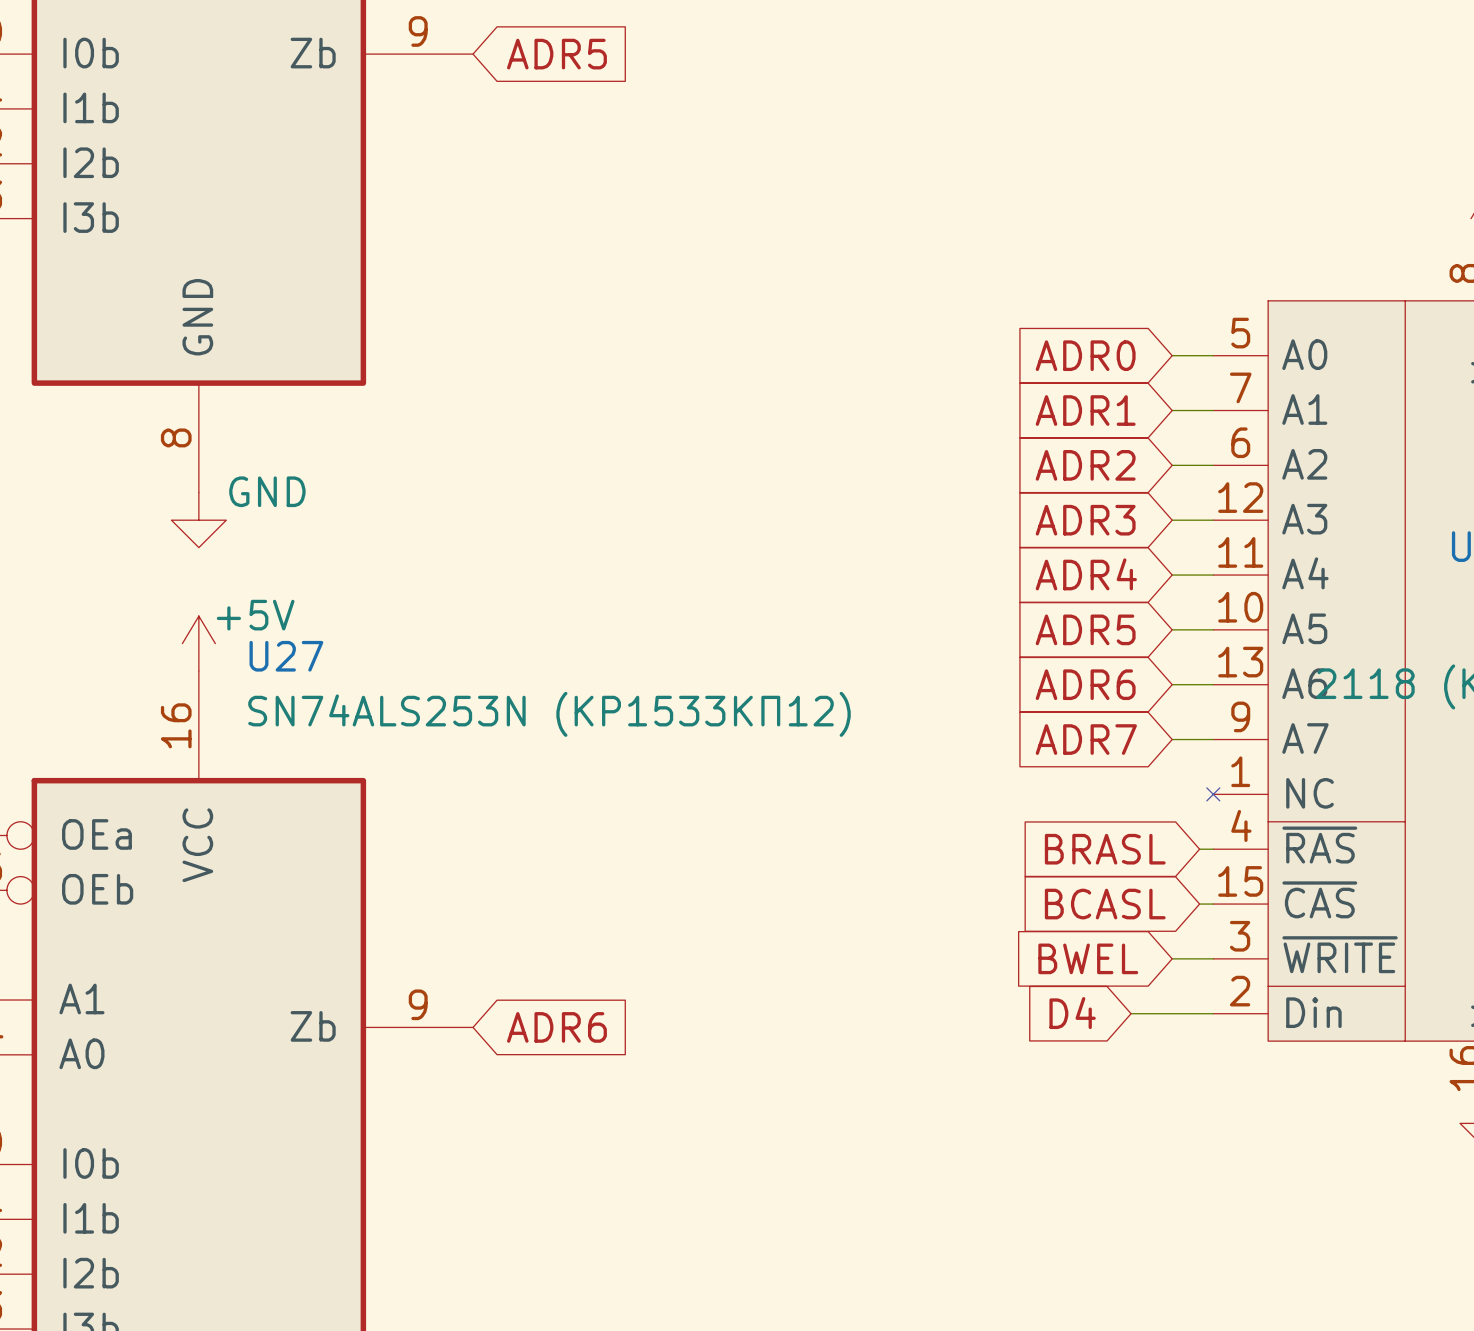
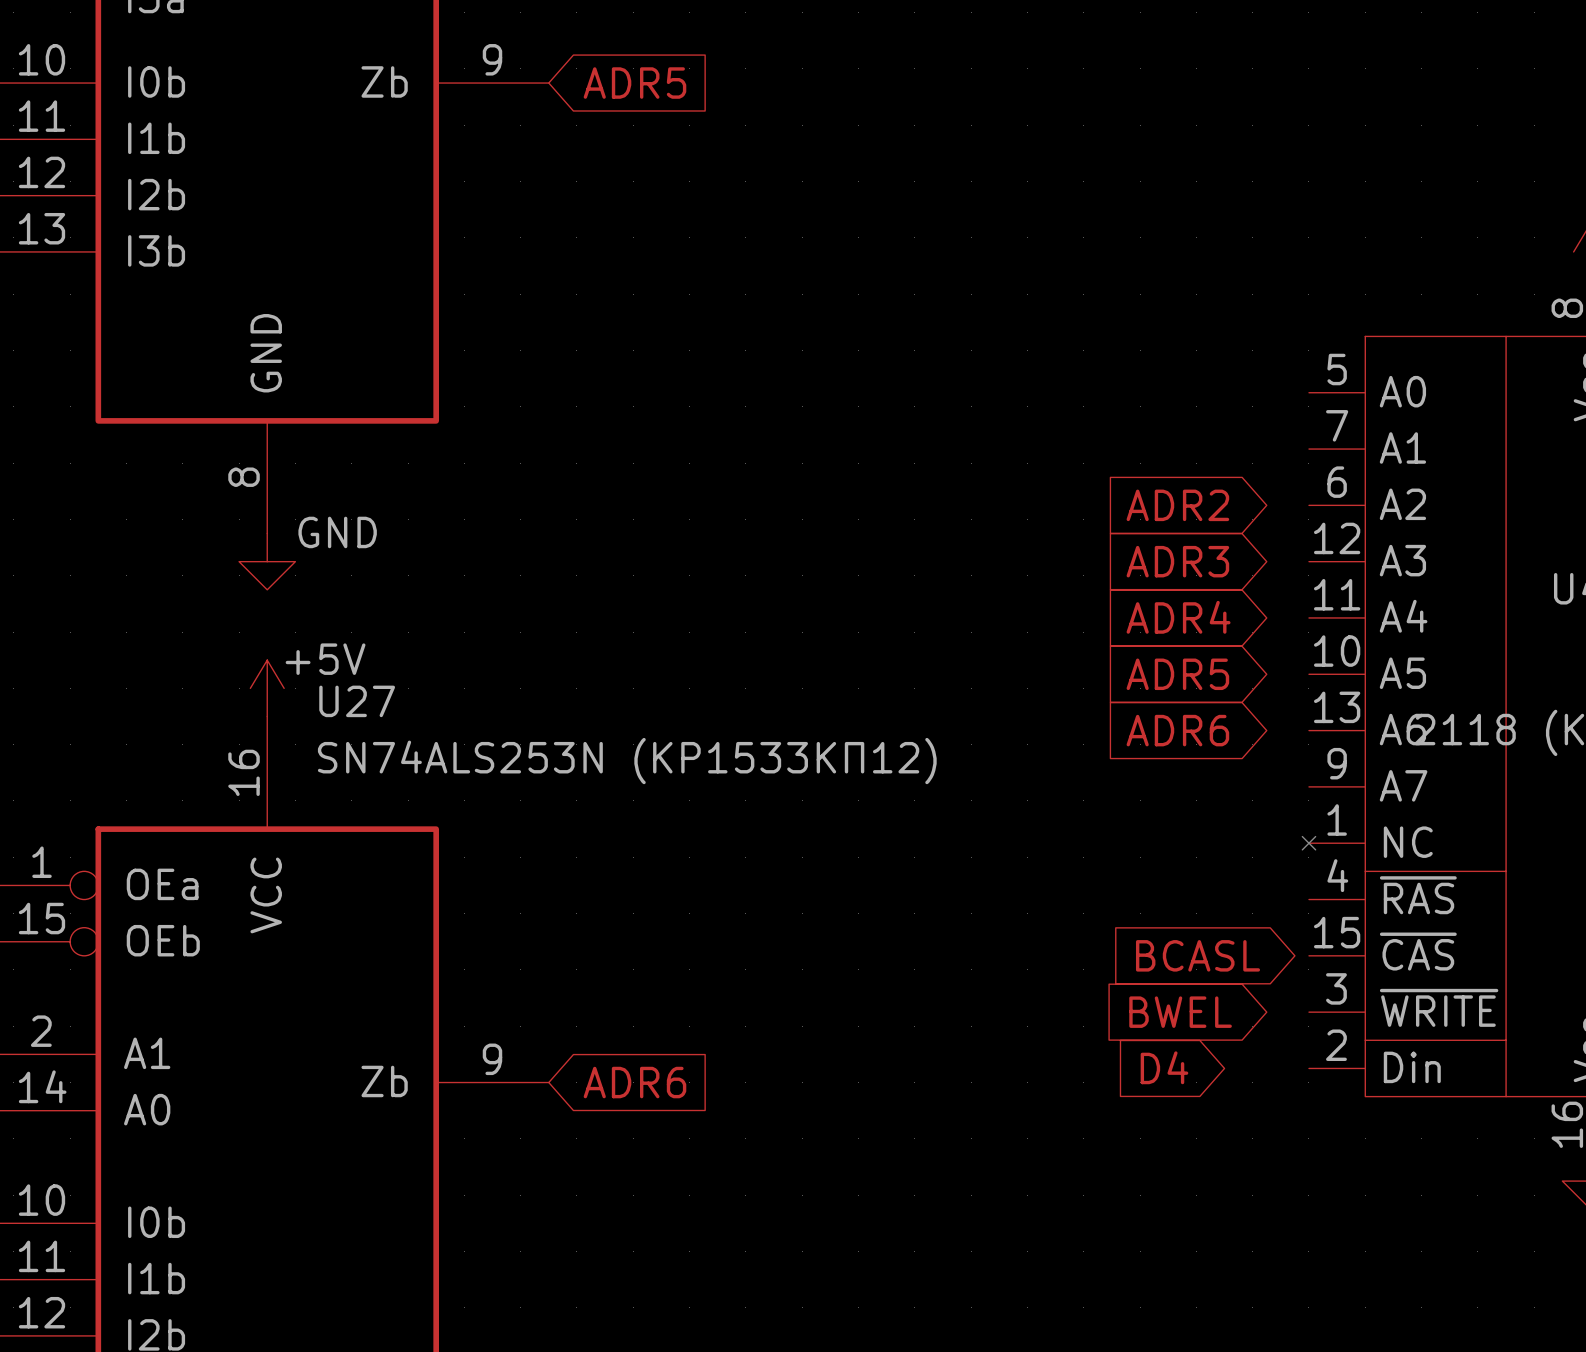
global label: ADR0 (1085, 355) -> none
wire: (1172, 355) (1213, 355) -> none
global label: ADR1 (1085, 410) -> none
wire: (1172, 410) (1213, 410) -> none
wire: (1172, 465) (1213, 465) -> none
wire: (1172, 520) (1213, 520) -> none
wire: (1172, 575) (1213, 575) -> none
wire: (1172, 629) (1213, 629) -> none
wire: (1172, 684) (1213, 684) -> none
global label: ADR7 (1086, 739) -> none
wire: (1172, 739) (1213, 739) -> none
global label: BRASL (1105, 849) -> none
wire: (1199, 849) (1213, 849) -> none
wire: (1199, 904) (1213, 904) -> none
wire: (1172, 958) (1213, 958) -> none
wire: (1131, 1013) (1213, 1013) -> none

